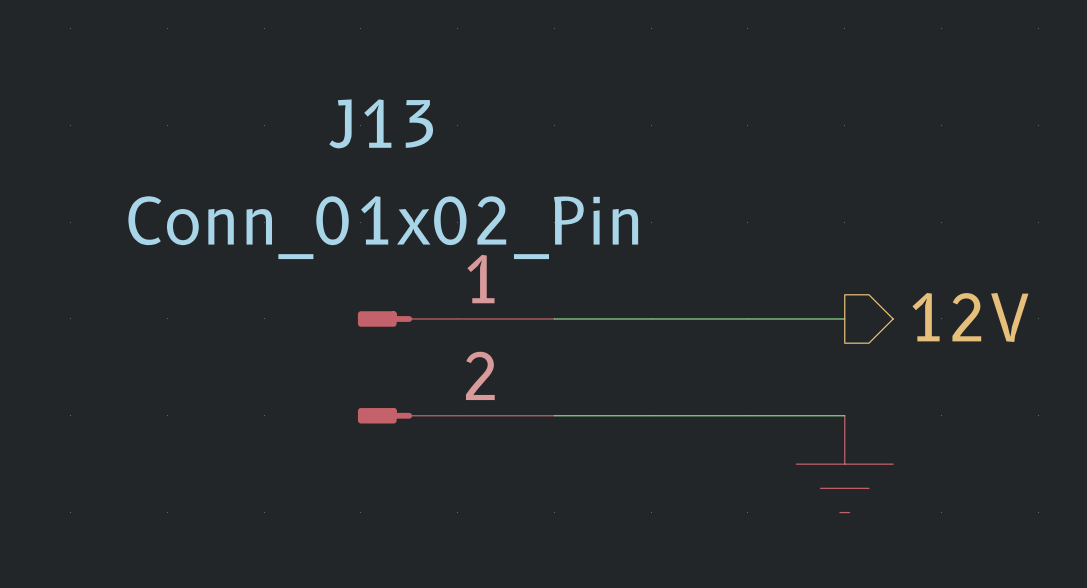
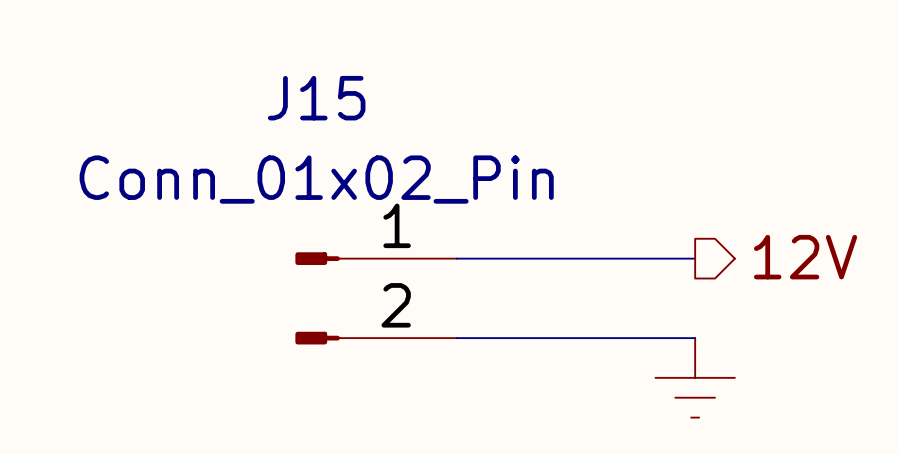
J13 name: J13 (381, 123) -> J15 (316, 98)

